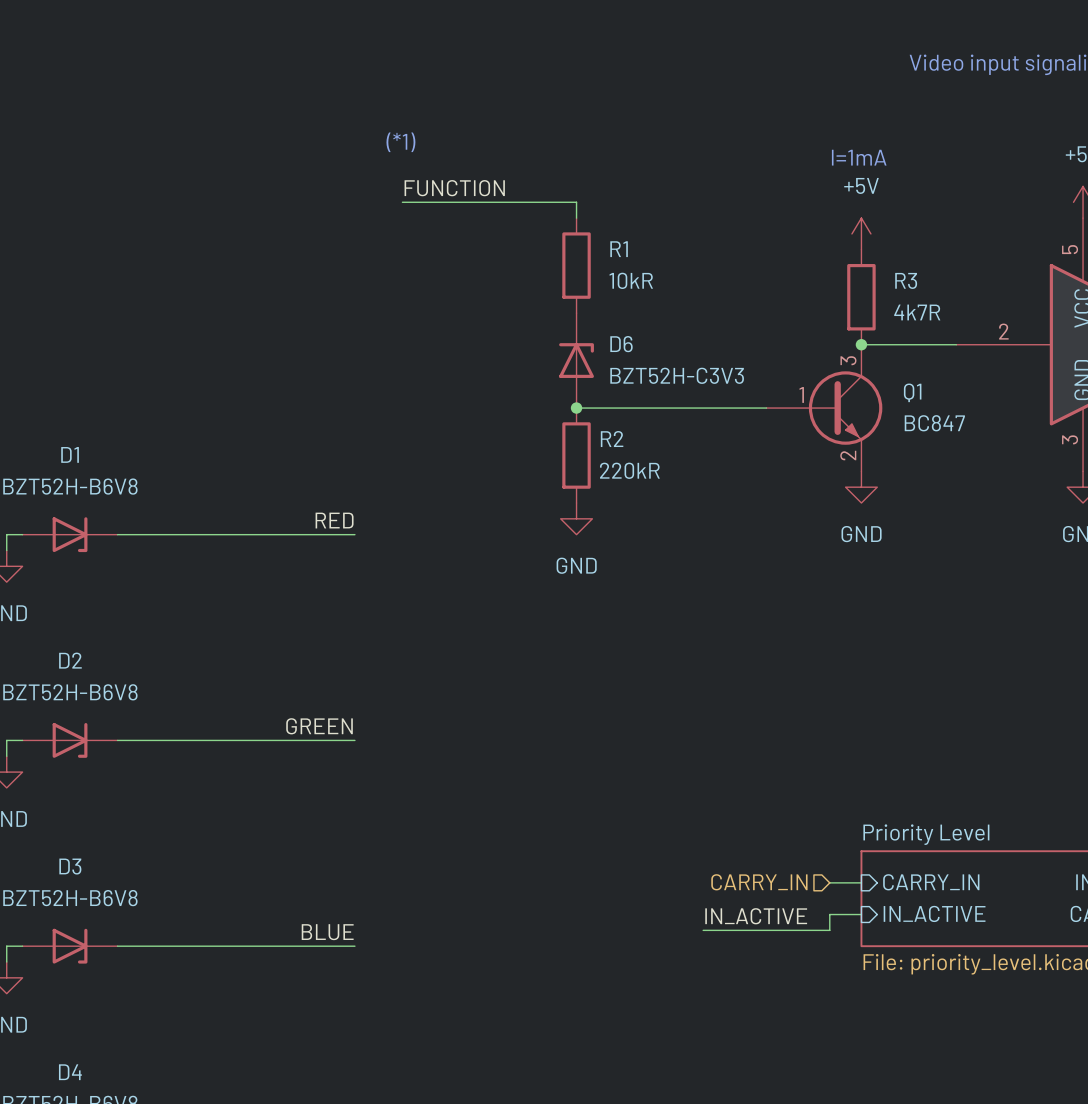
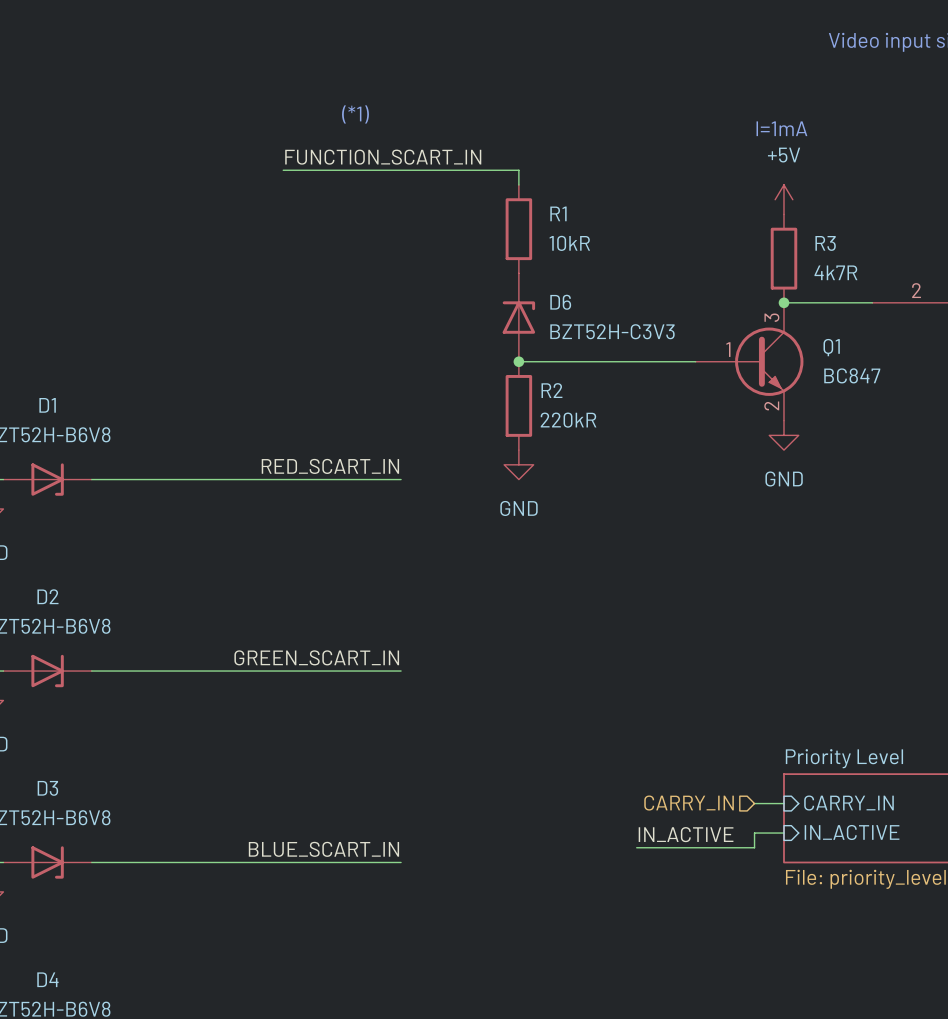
label: FUNCTION (454, 188) -> FUNCTION_SCART_IN (383, 157)
wire: none -> (283, 170) (356, 170)
label: RED (334, 520) -> none
label: none -> RED_SCART_IN (330, 466)
wire: none -> (312, 479) (401, 479)
label: GREEN (319, 726) -> none
label: none -> GREEN_SCART_IN (316, 657)
wire: none -> (312, 671) (401, 671)
label: BLUE (327, 932) -> none
label: none -> BLUE_SCART_IN (323, 849)
wire: none -> (312, 862) (401, 862)

